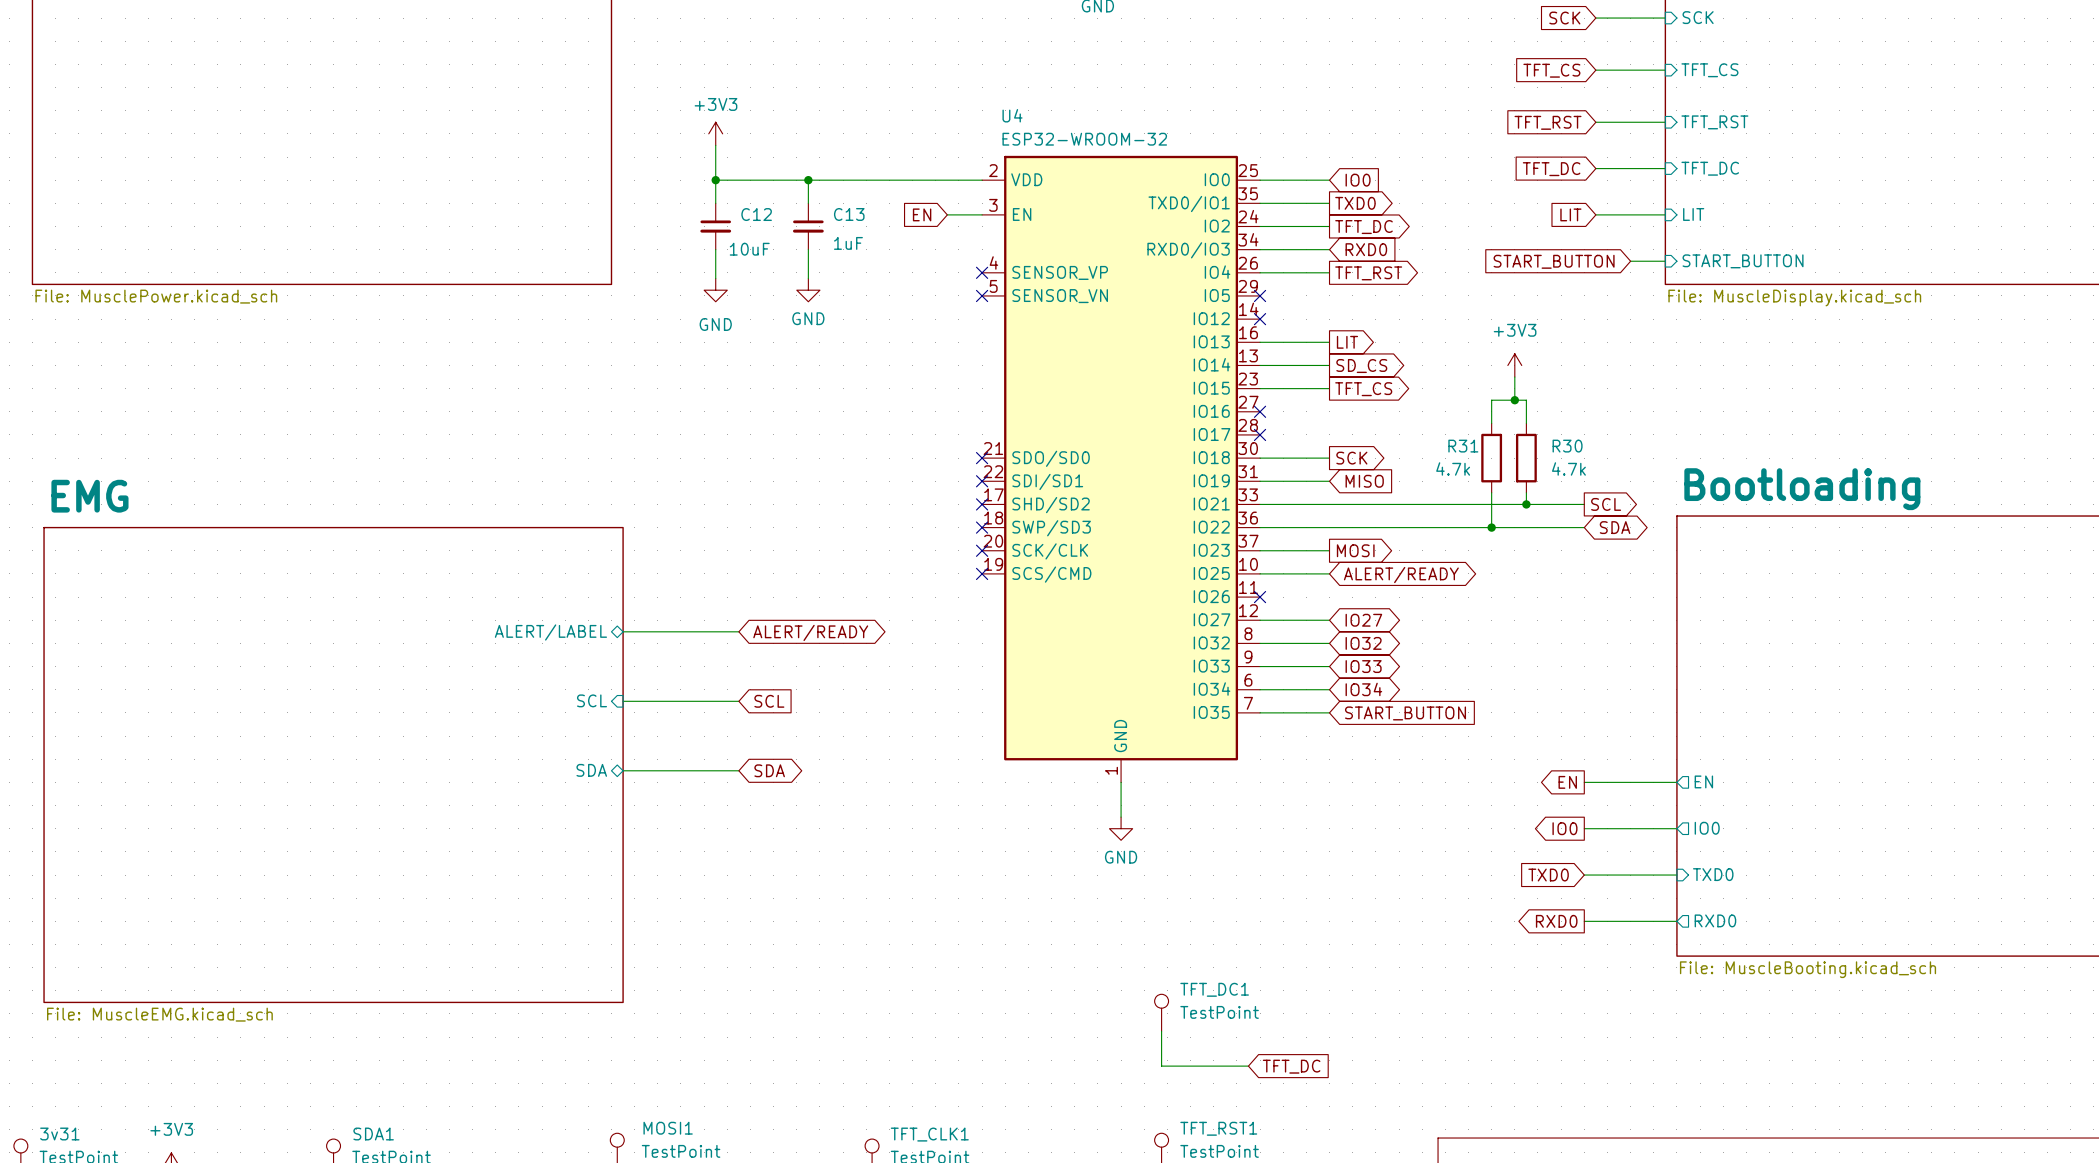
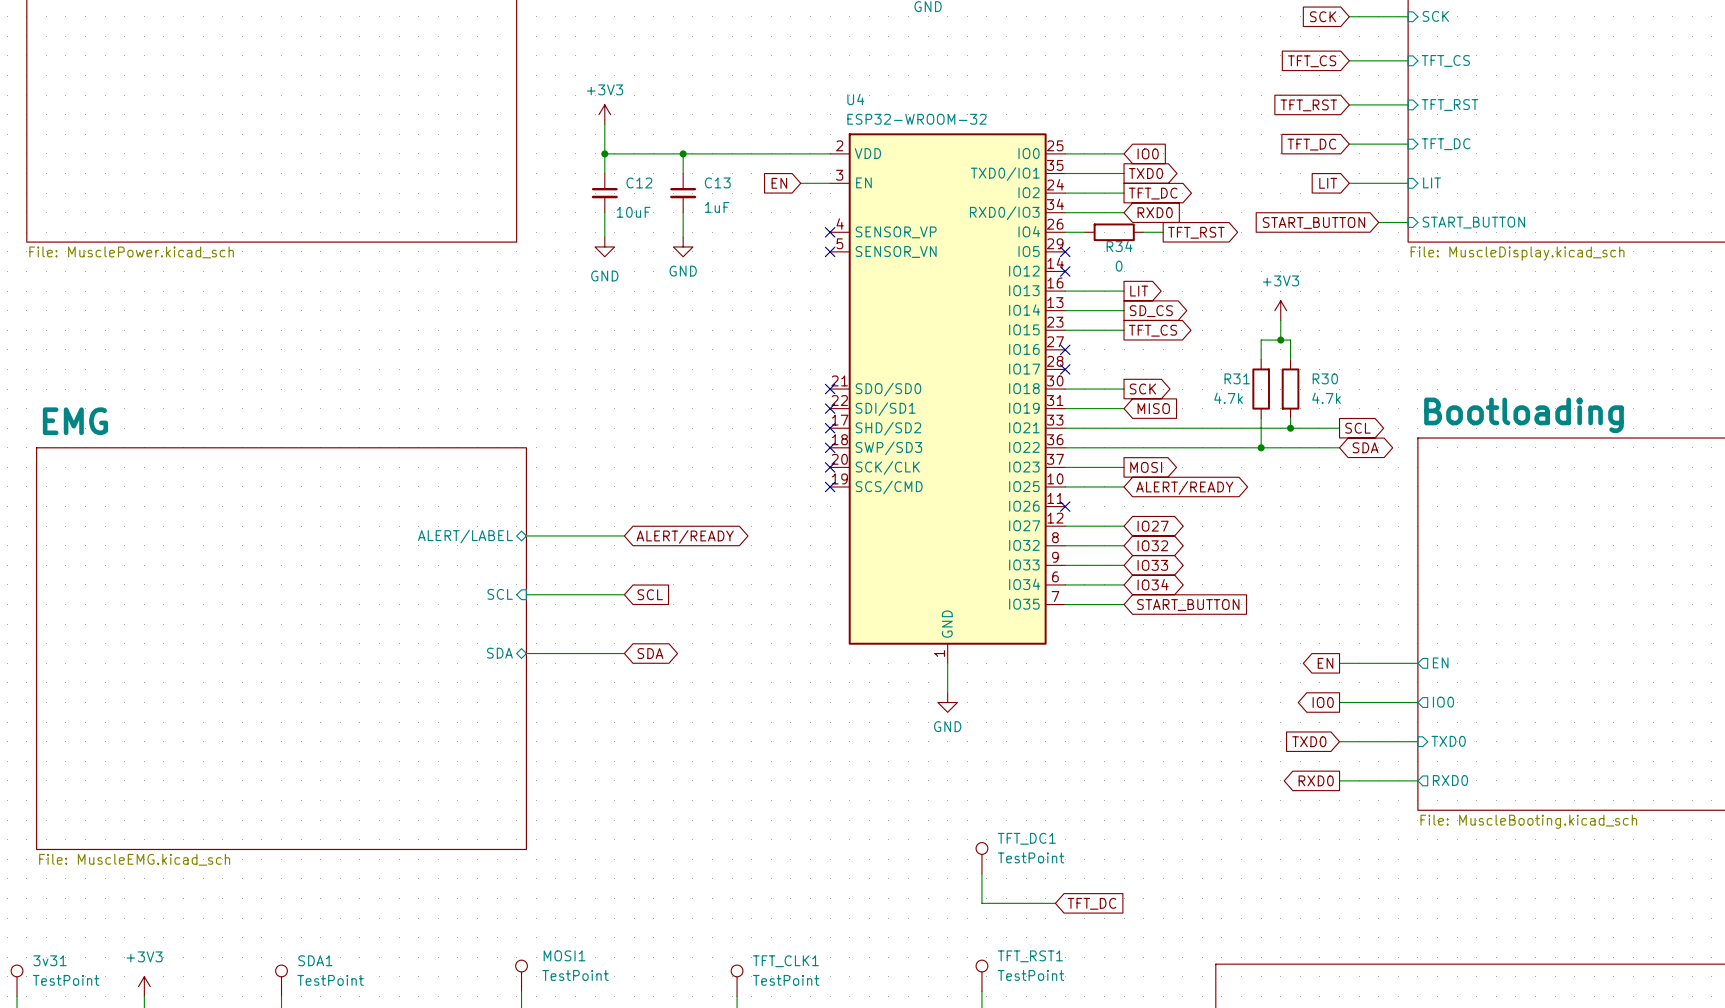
wire: (1283, 272) (1329, 272) -> none
R34: none -> 0 (1114, 232)
wire: none -> (1143, 232) (1163, 232)
global label position: TFT_RST (1368, 273) -> TFT_RST (1196, 232)

